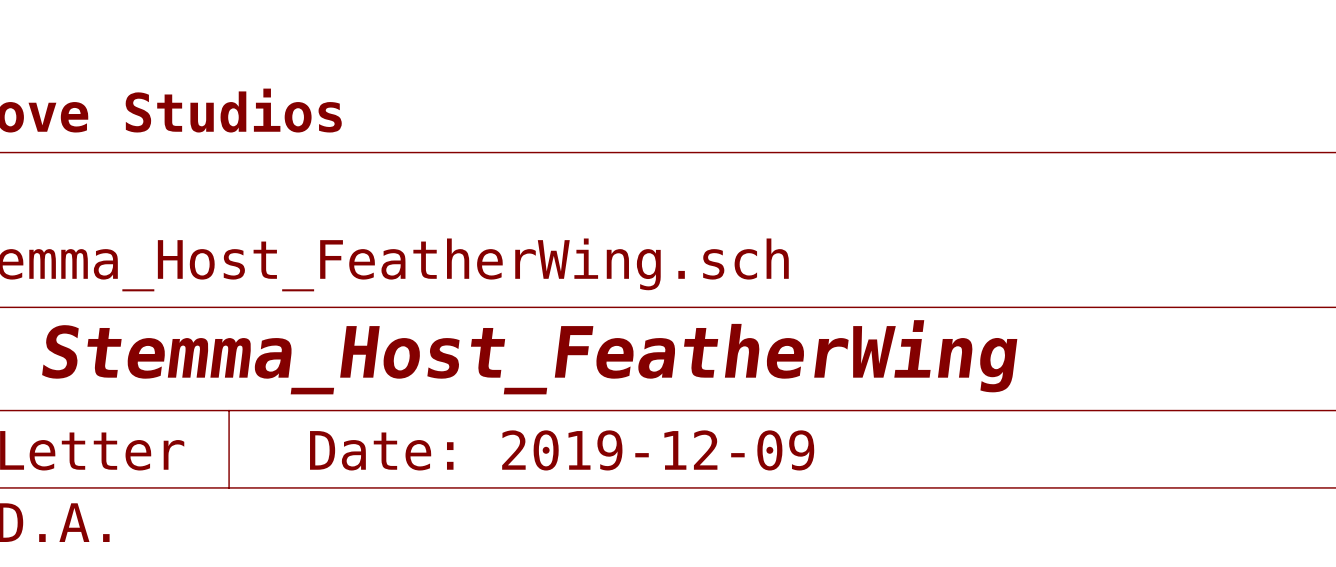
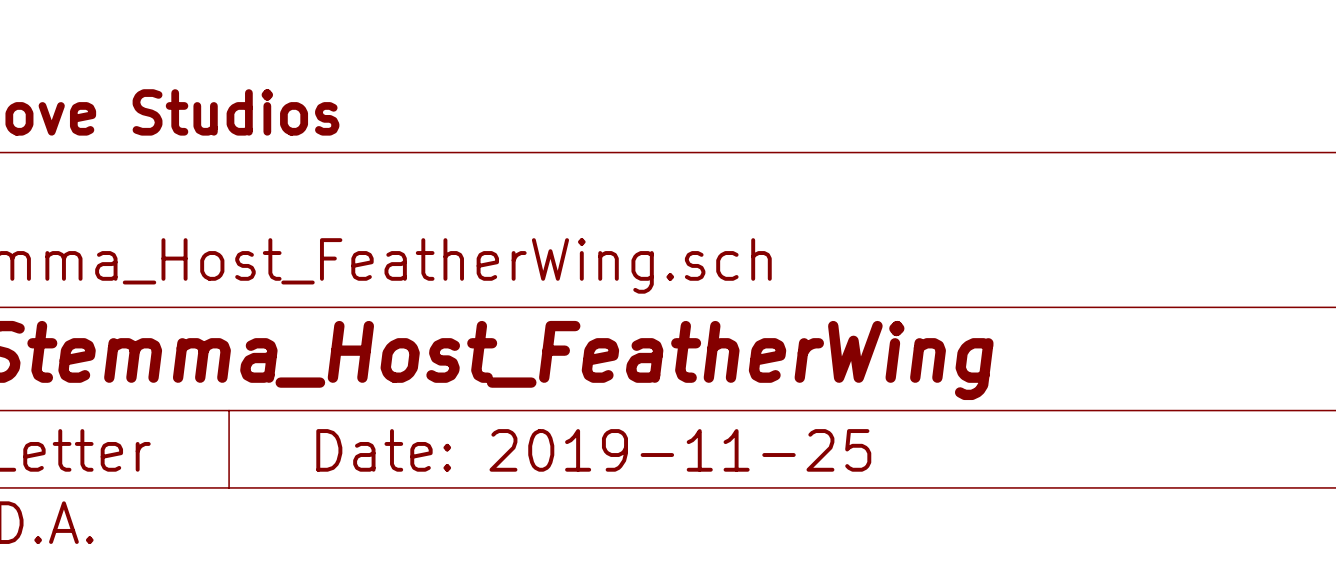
title block: Date: 2019-12-09 (562, 450) -> Date: 2019-11-25 (593, 450)

